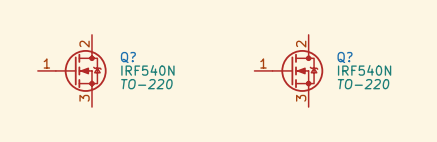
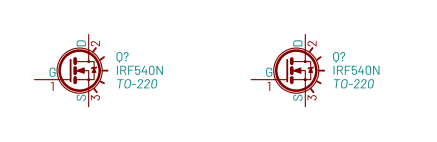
Q? symbol: [37, 34, 107, 108] -> [34, 34, 109, 107]
Q? symbol: [254, 34, 324, 108] -> [251, 34, 326, 107]

